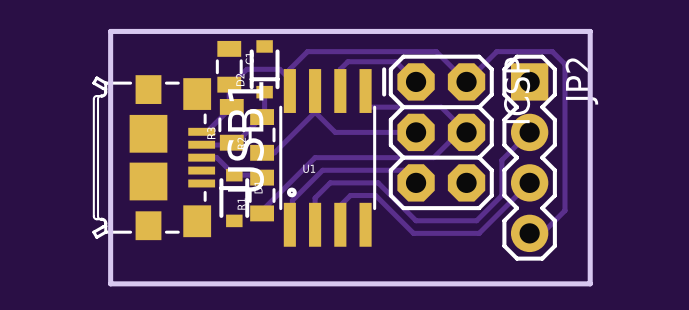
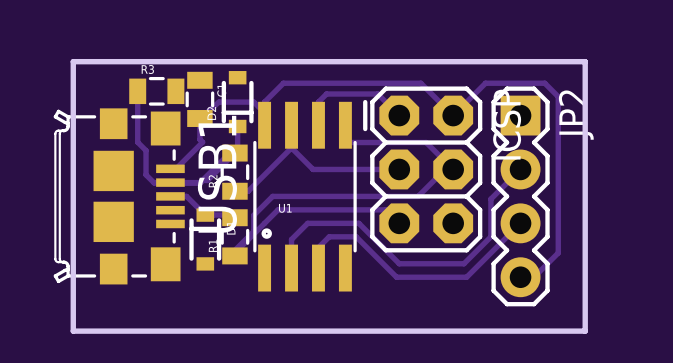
track: none -> (137, 91) (137, 142) (146, 150) (146, 174) (154, 182) (200, 182) (229, 153) (232, 153)
R3 rotation: 0° (231, 124) -> 90° clockwise (156, 91)
R3 position: (231, 124) -> (156, 91)
track: (315, 157) (302, 170) -> (299, 209) (278, 209)
track: none -> (291, 196) (272, 196) (253, 215) (253, 231) (232, 252)
track: (322, 170) (292, 200) (292, 205) (289, 208) -> none

